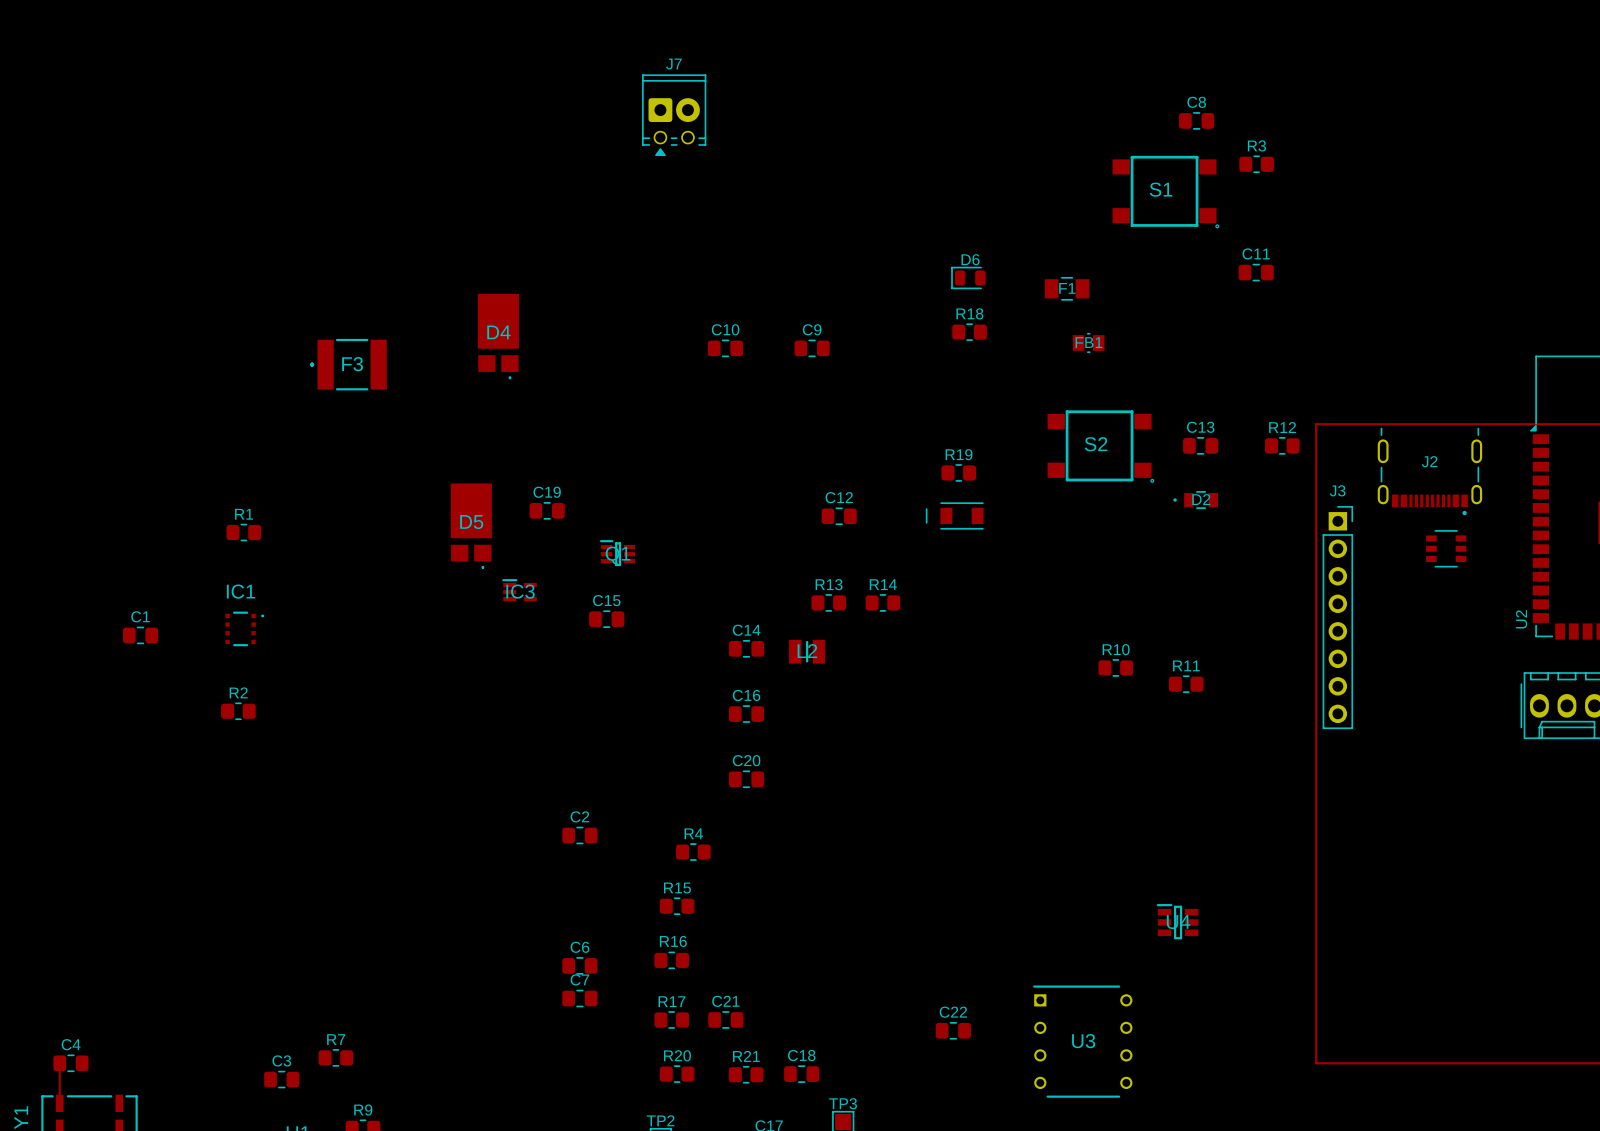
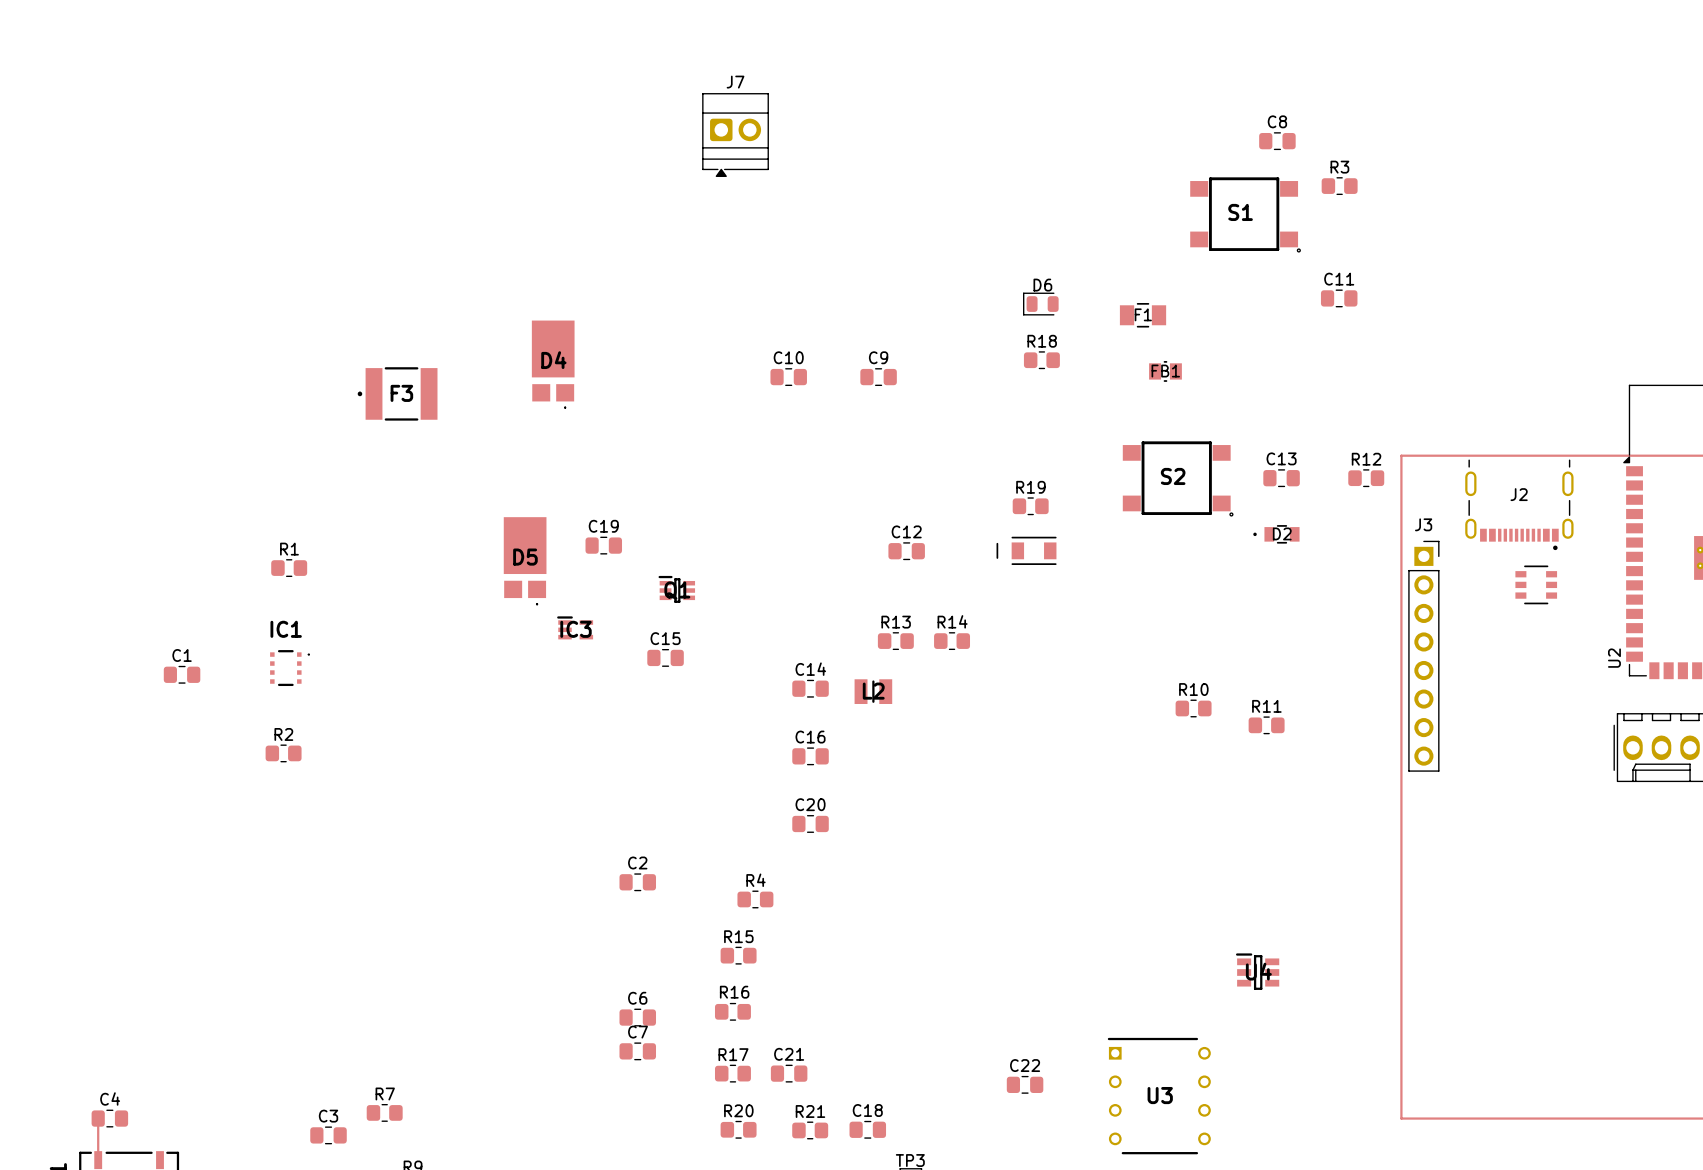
J7 footprint: [642, 74, 707, 157] -> [702, 93, 769, 177]

